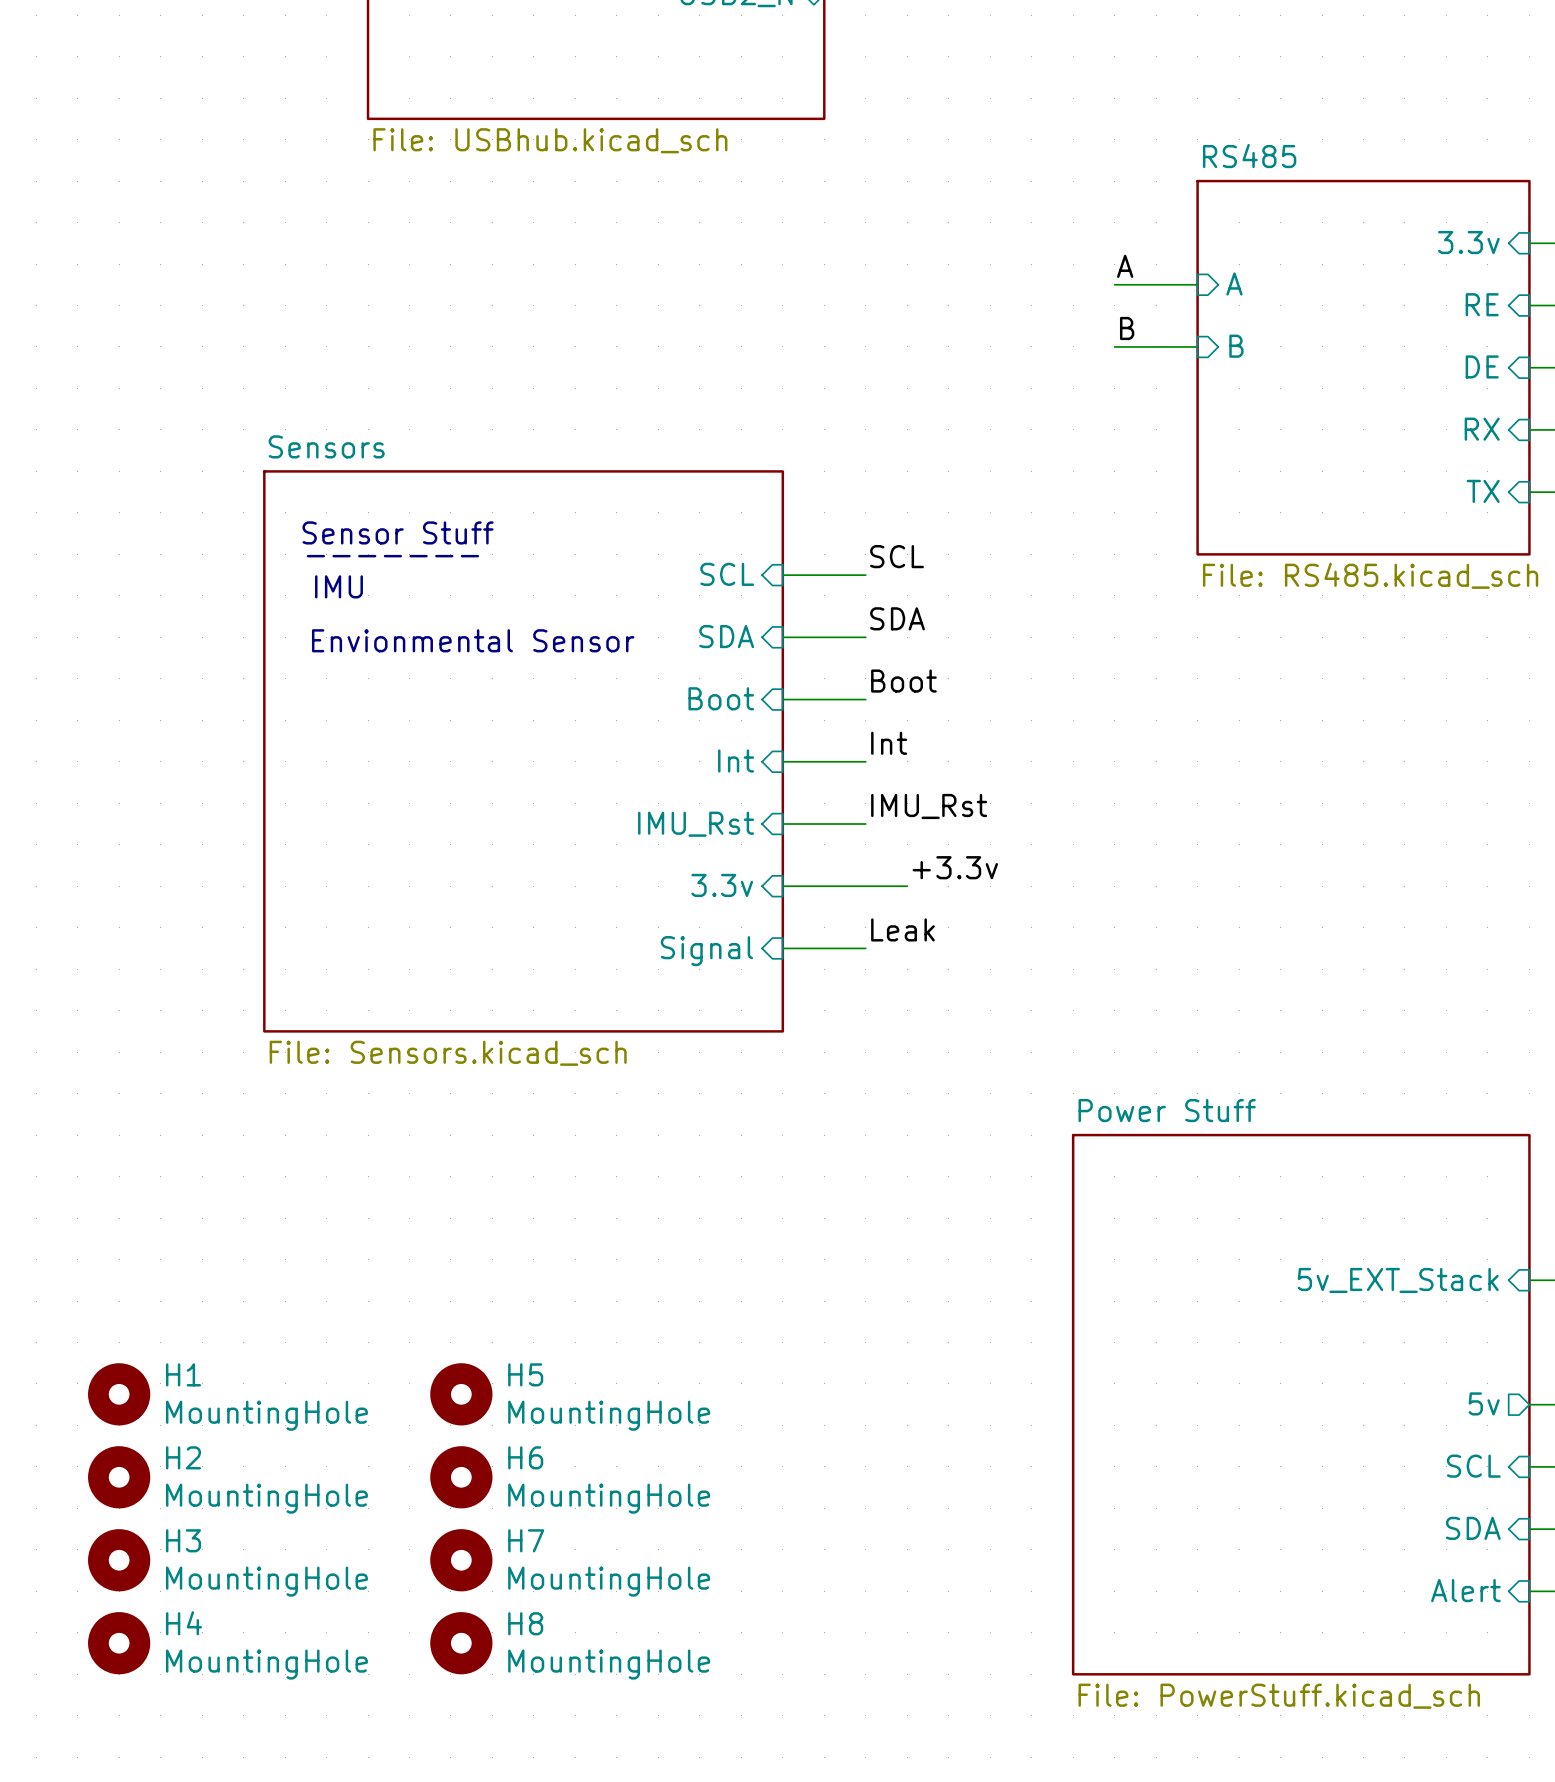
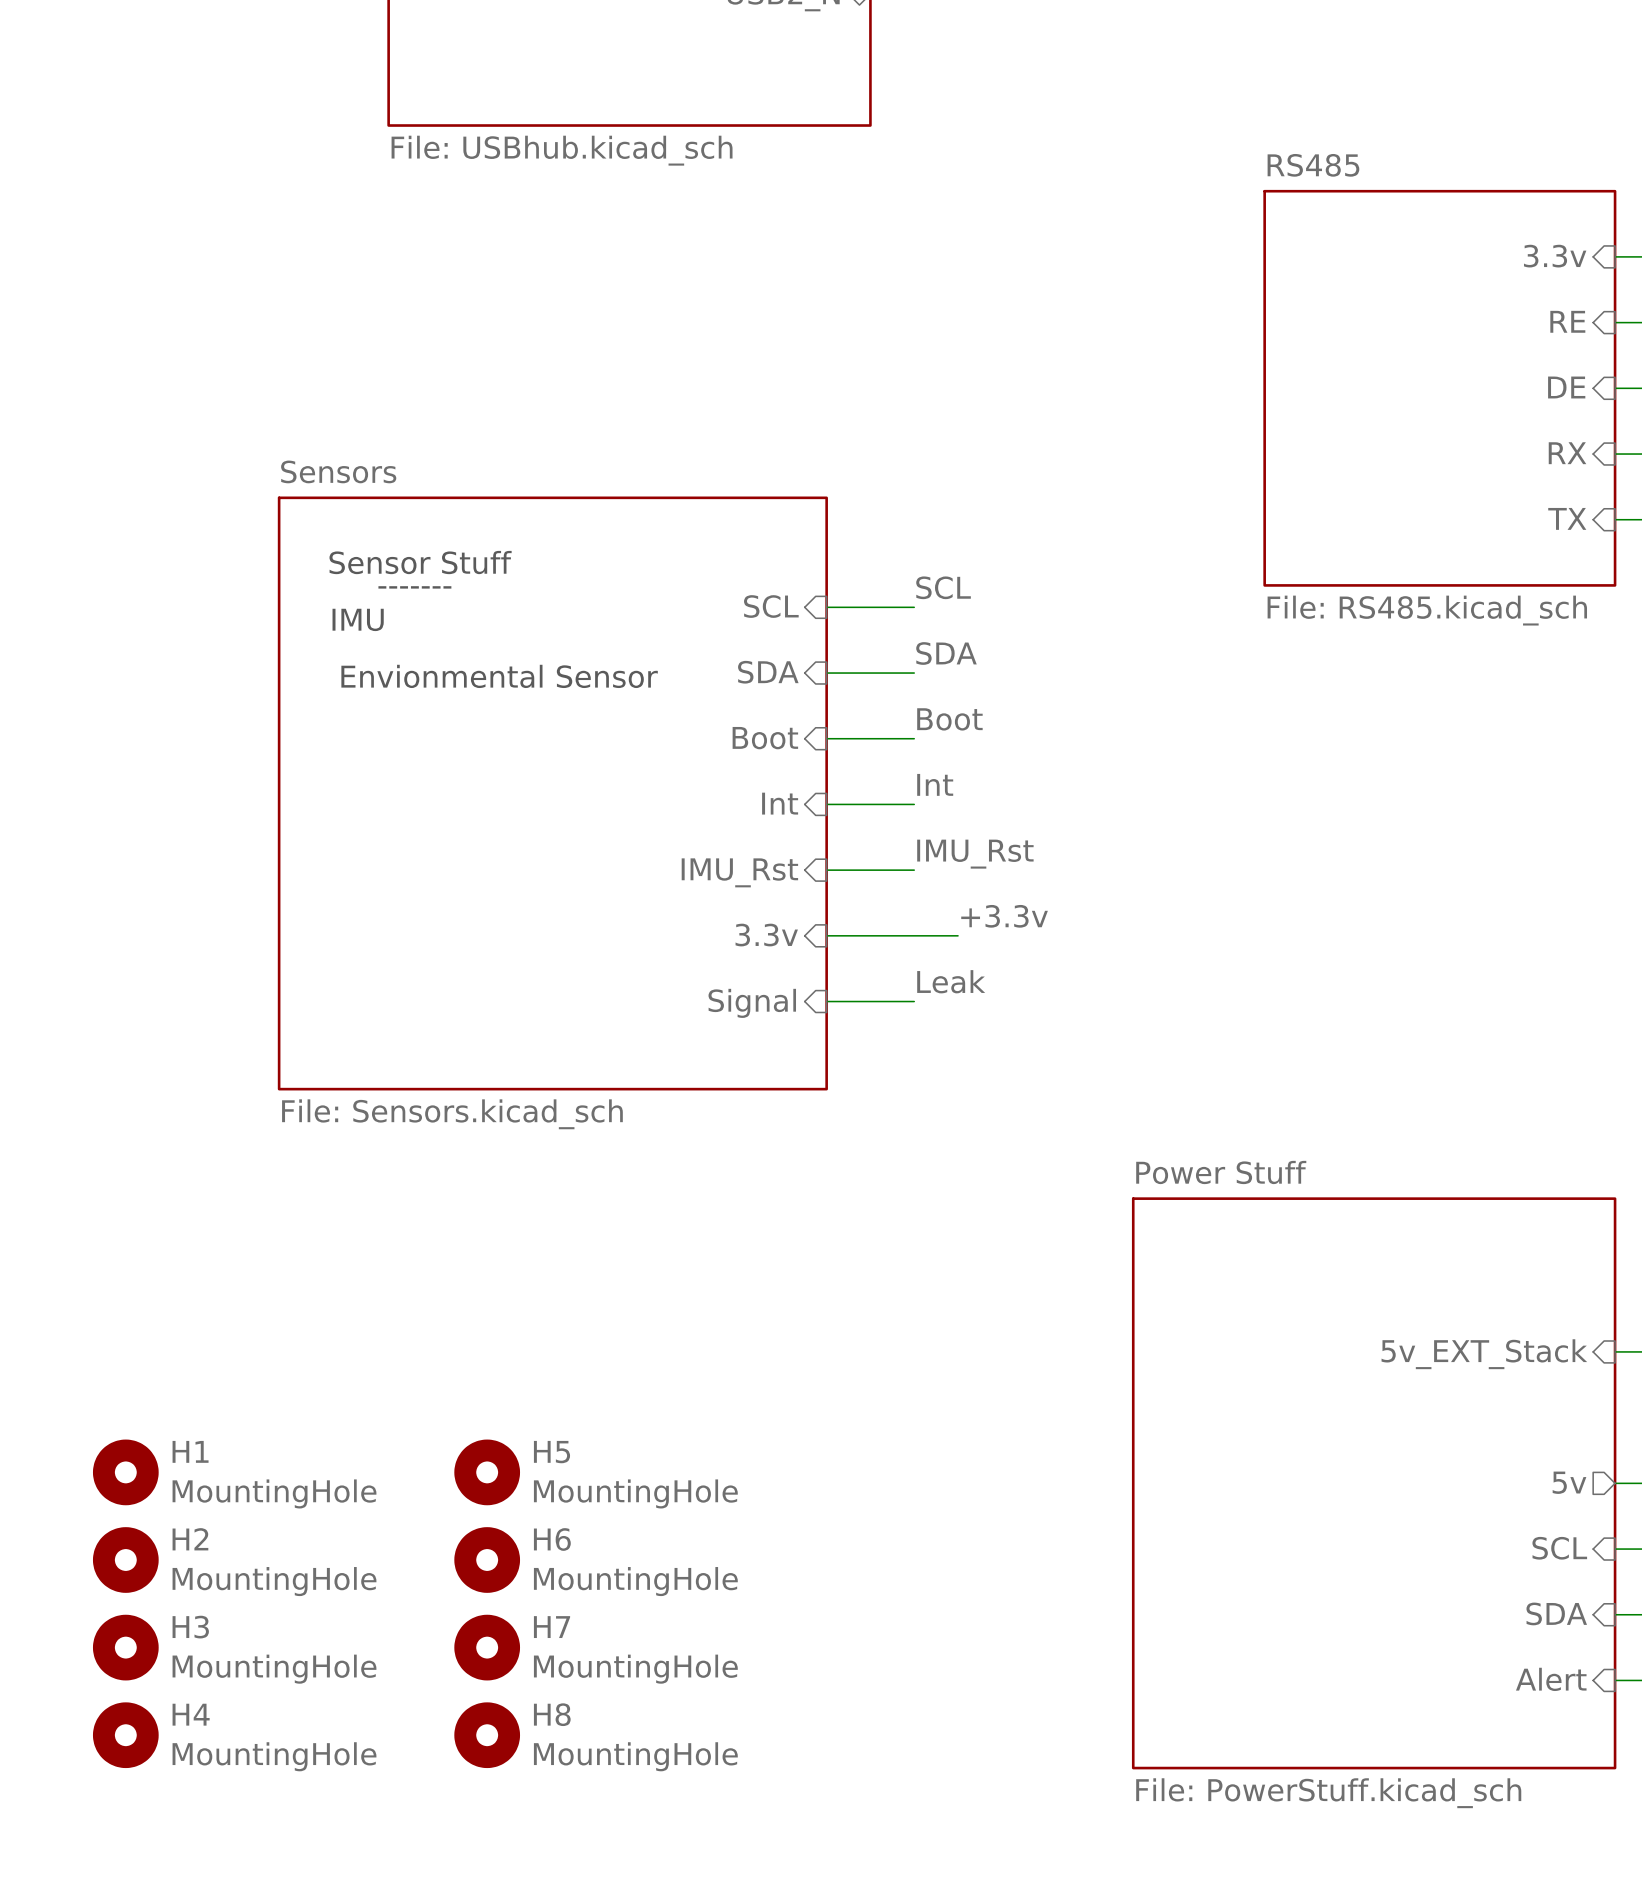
label: A (1125, 266) -> none
sheet pin: A (1234, 283) -> none
wire: (1114, 284) (1197, 284) -> none
label: B (1127, 328) -> none
wire: (1114, 346) (1197, 346) -> none
sheet pin: B (1236, 346) -> none

